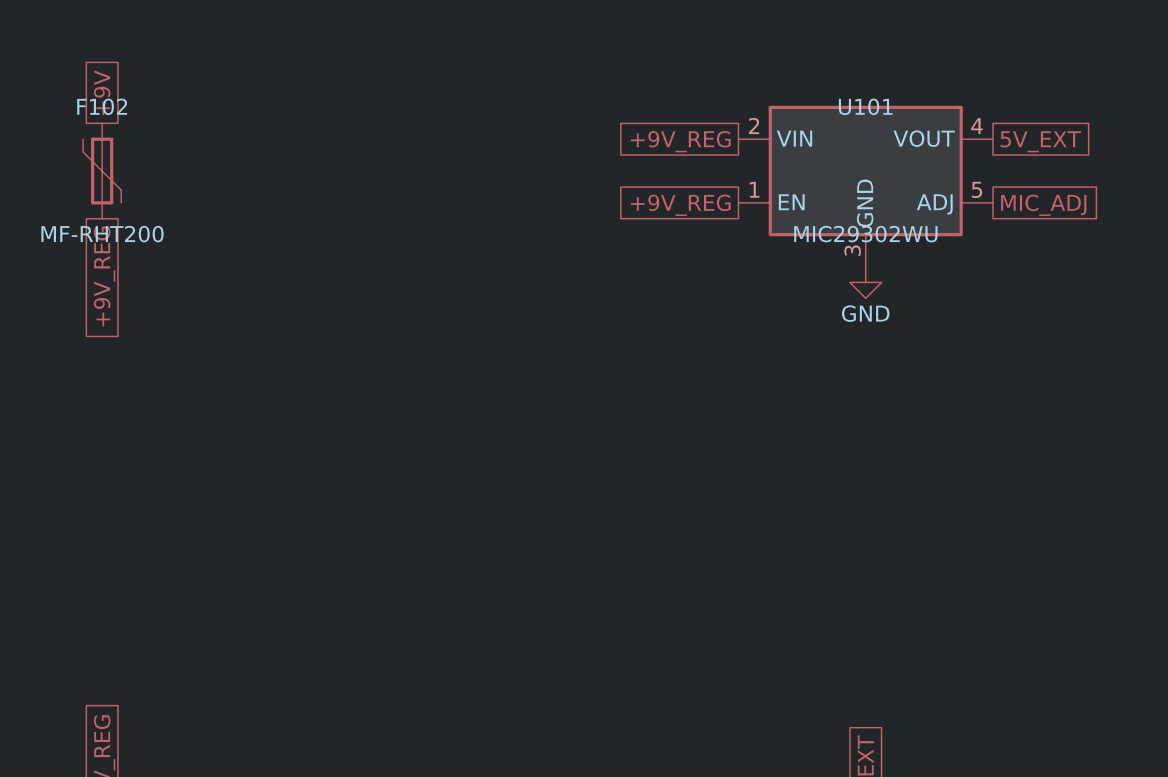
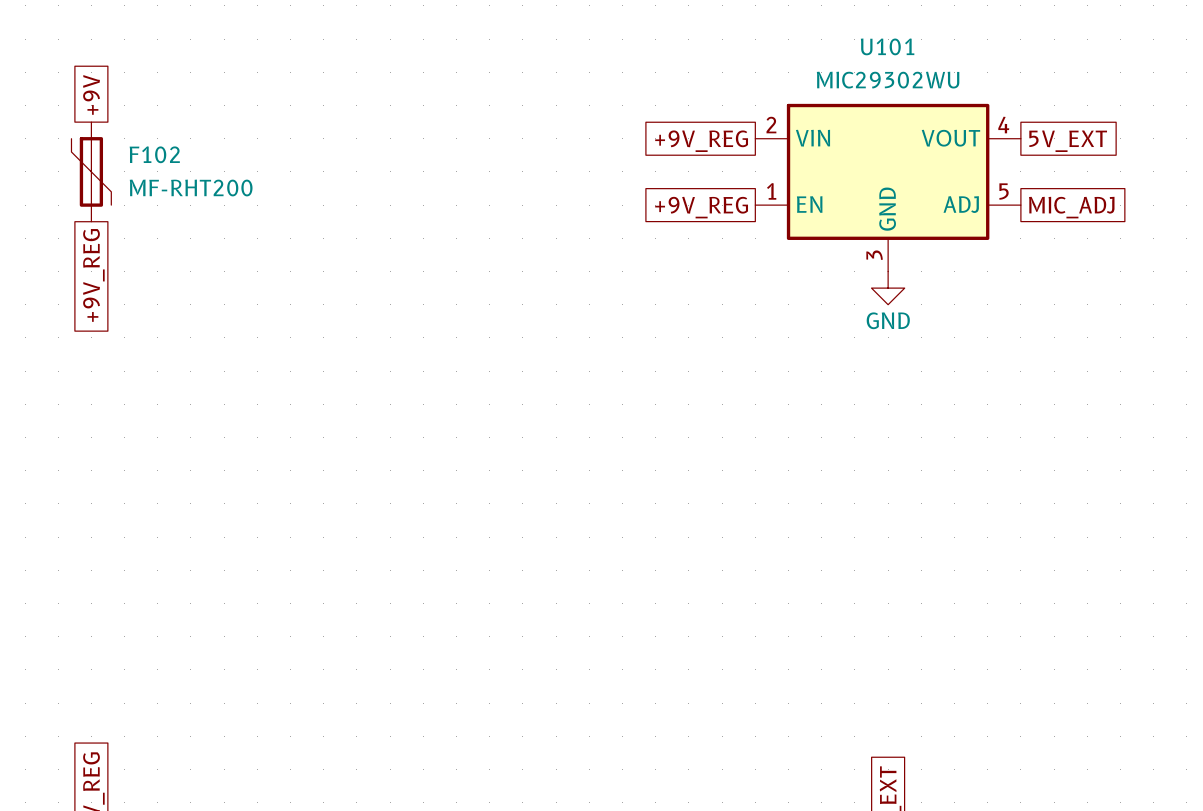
F102 name position: F102 (102, 106) -> F102 (154, 154)
U101 name position: U101 (865, 106) -> U101 (887, 46)
F102 value position: MF-RHT200 (102, 234) -> MF-RHT200 (191, 187)
U101 value position: MIC29302WU (865, 234) -> MIC29302WU (888, 80)

